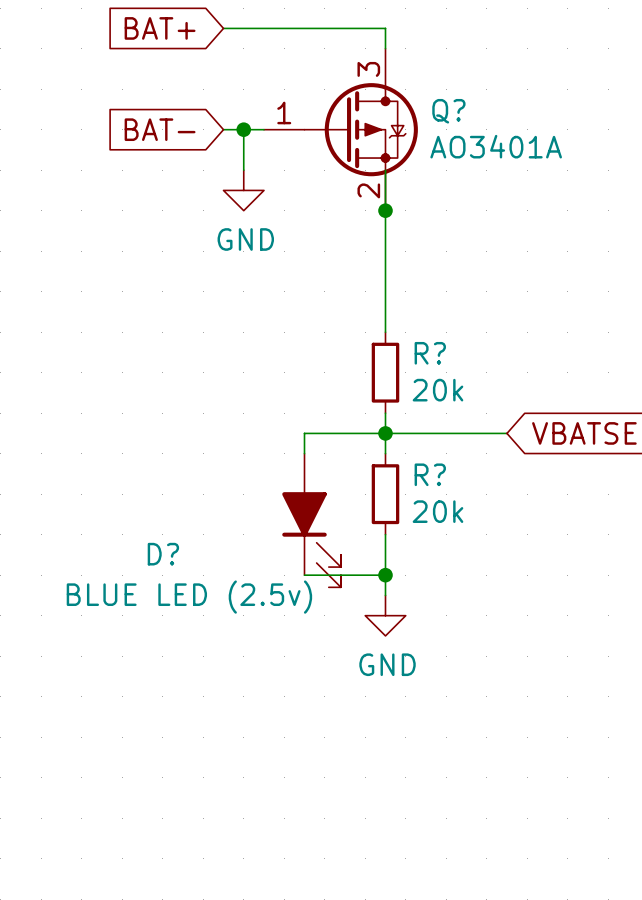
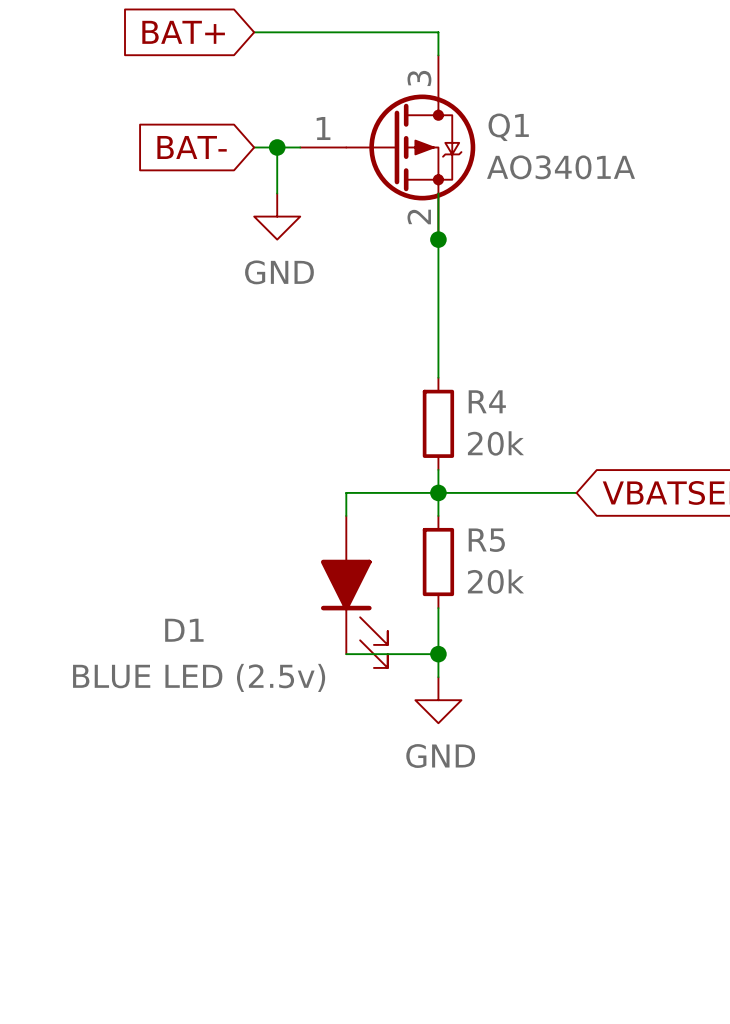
Q? name: Q? (448, 111) -> Q1 (508, 127)
R? name: R? (430, 353) -> R4 (487, 401)
R? name: R? (430, 474) -> R5 (486, 540)
D? name: D? (163, 554) -> D1 (184, 630)

